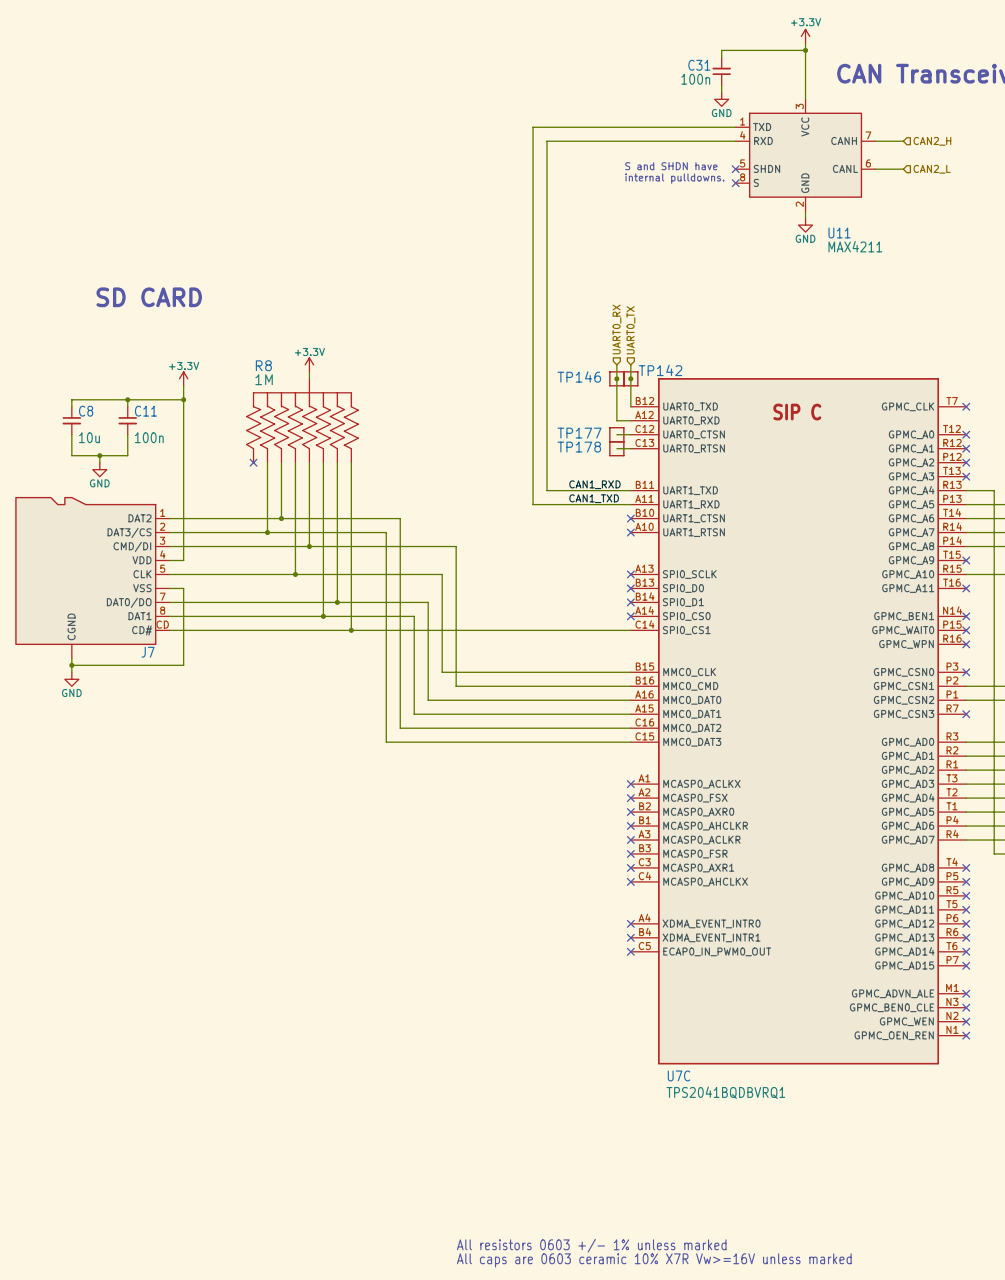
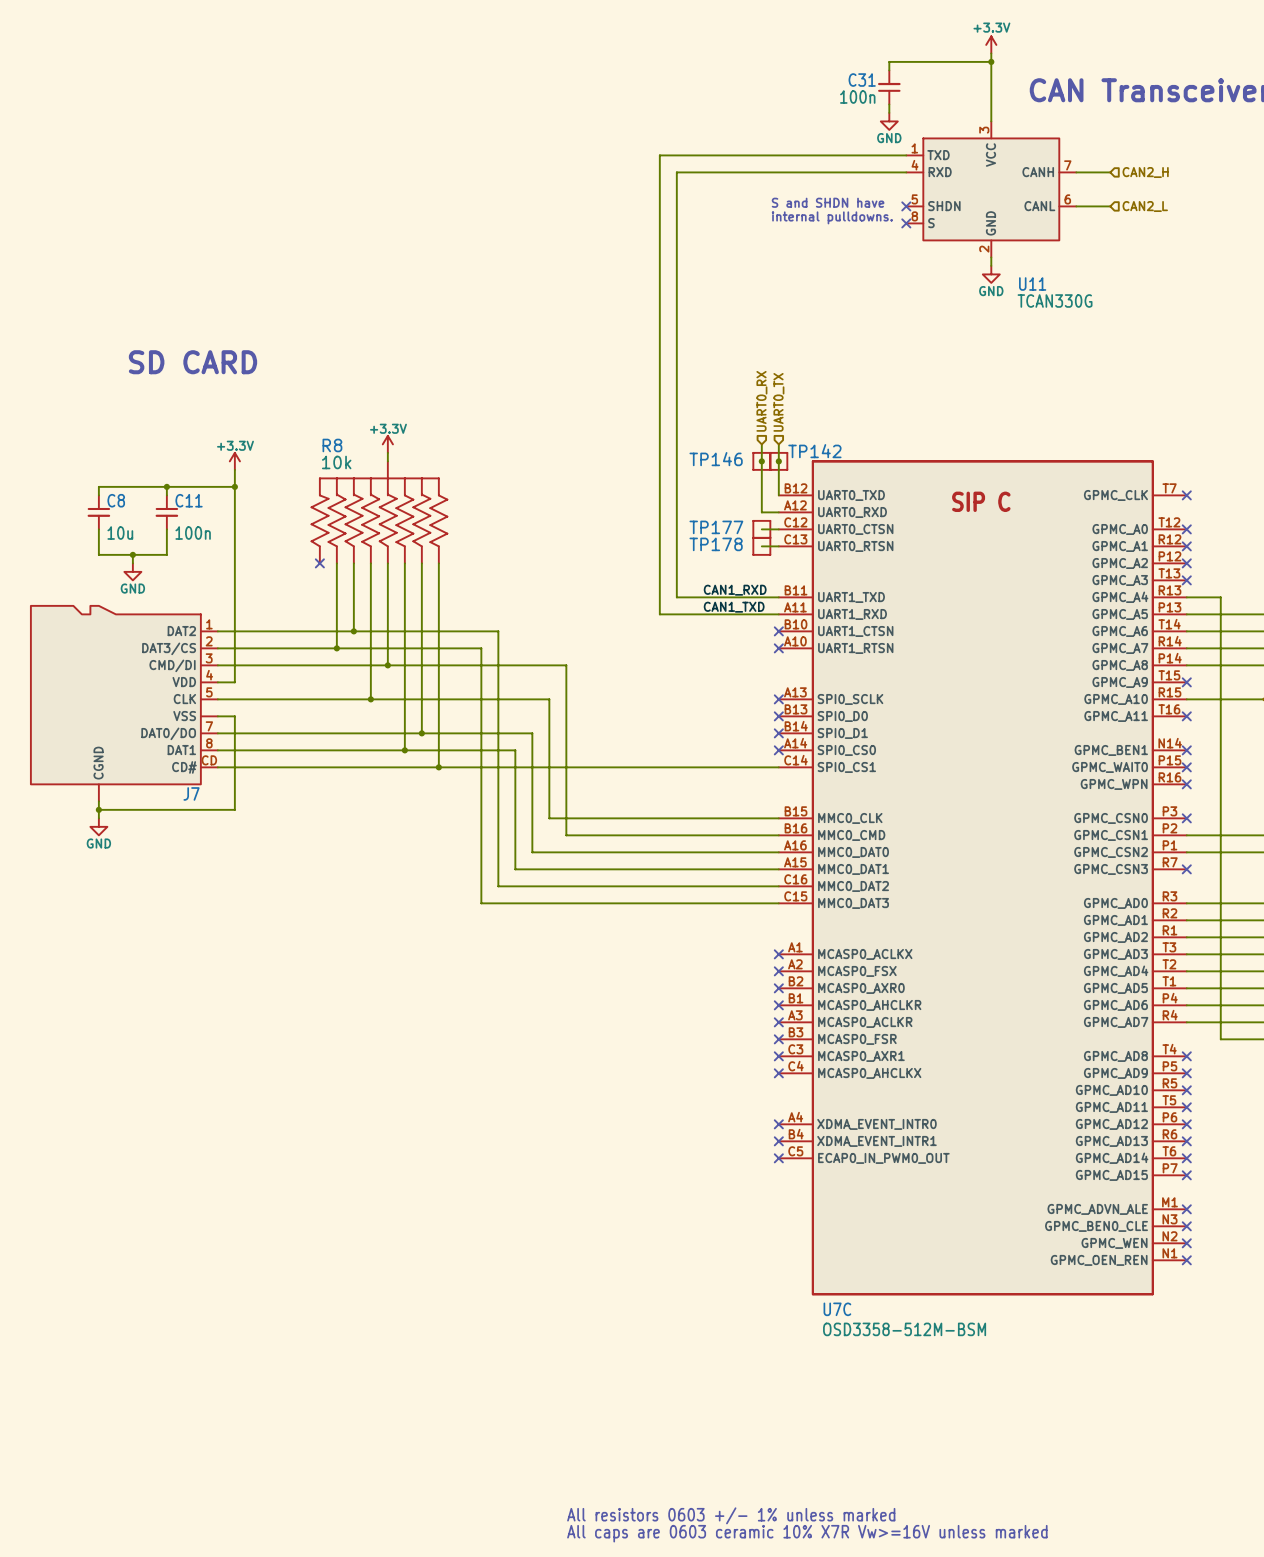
U11 value: MAX4211 (855, 246) -> TCAN330G (1055, 301)
R8 value: 1M (264, 379) -> 10k (336, 462)
U7C value: TPS2041BQDBVRQ1 (725, 1092) -> OSD3358-512M-BSM (904, 1329)

